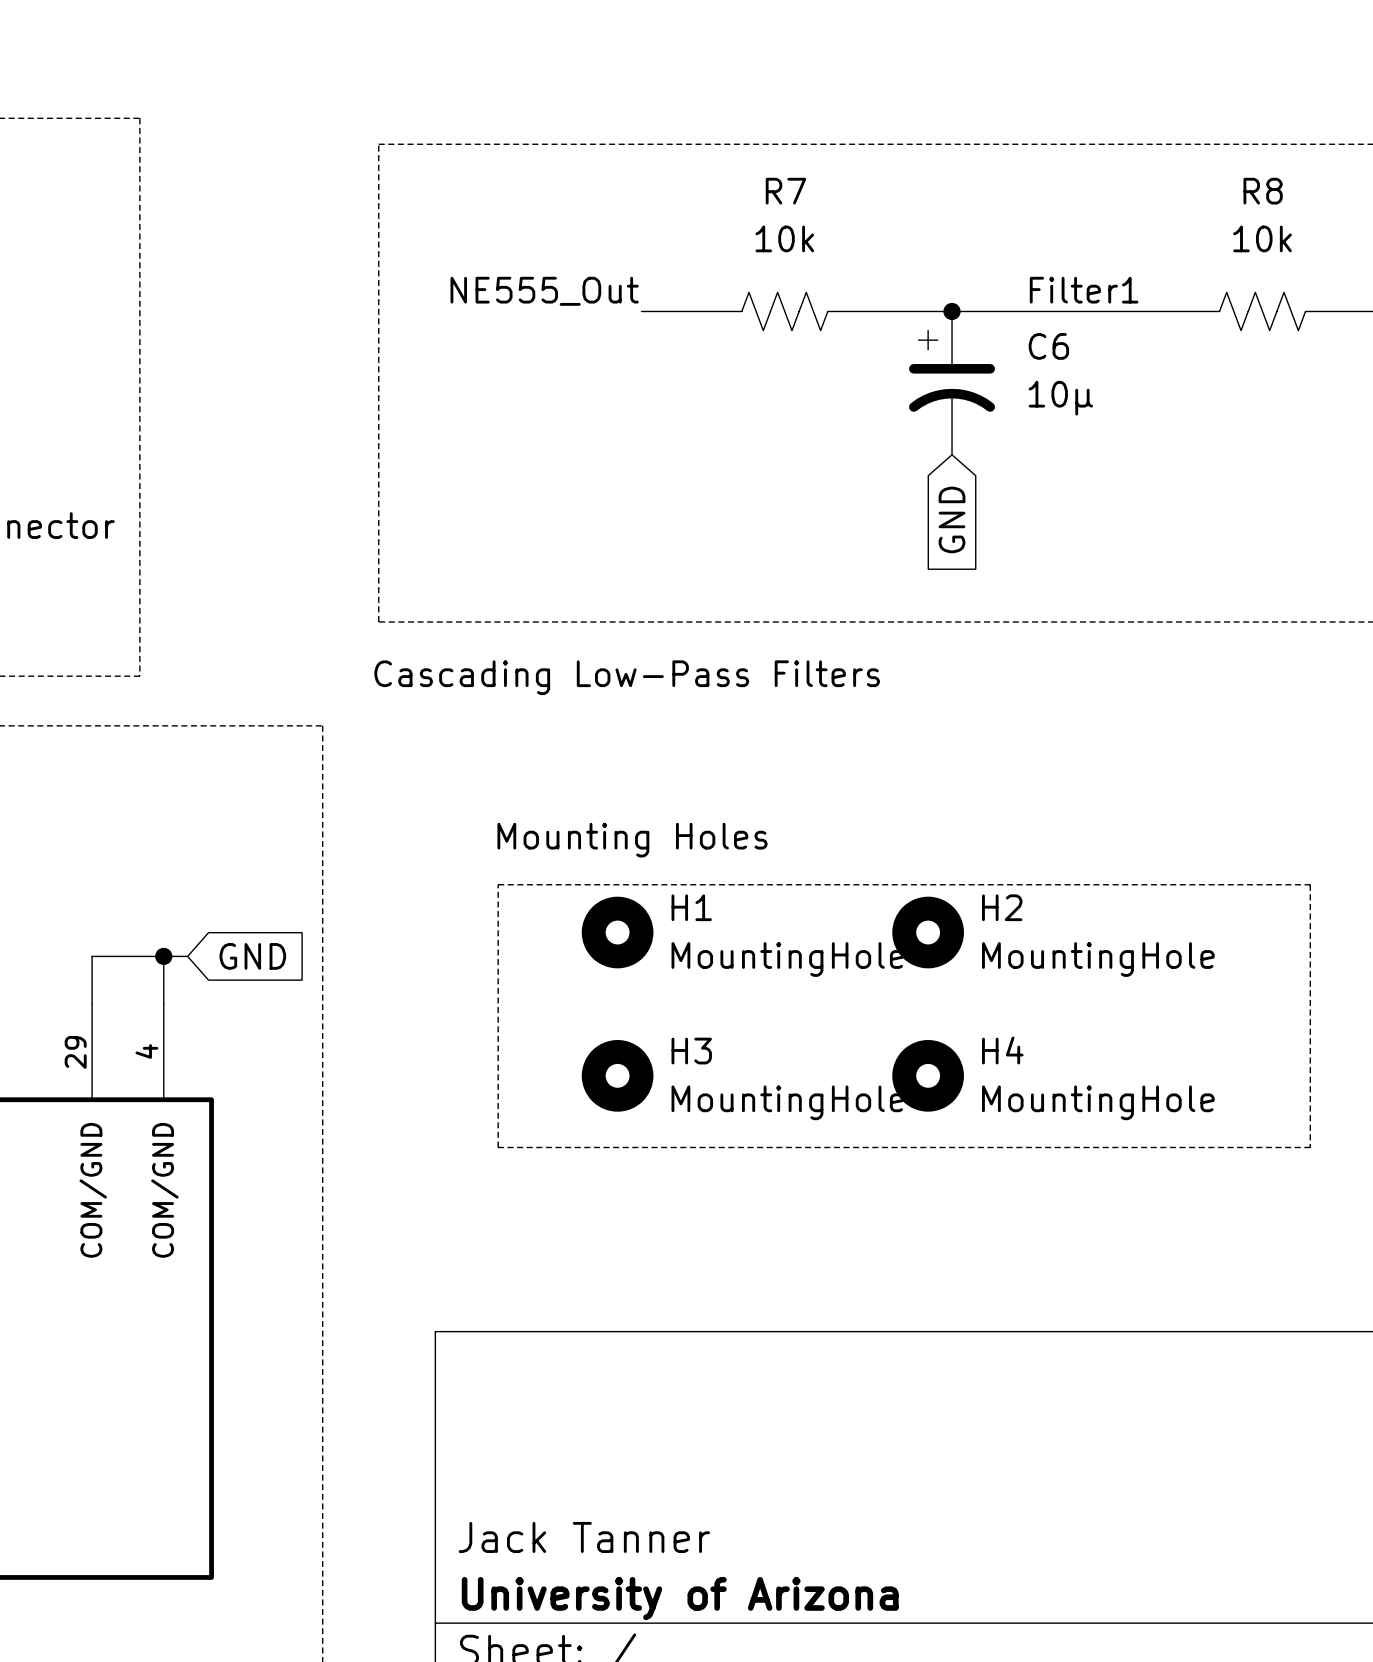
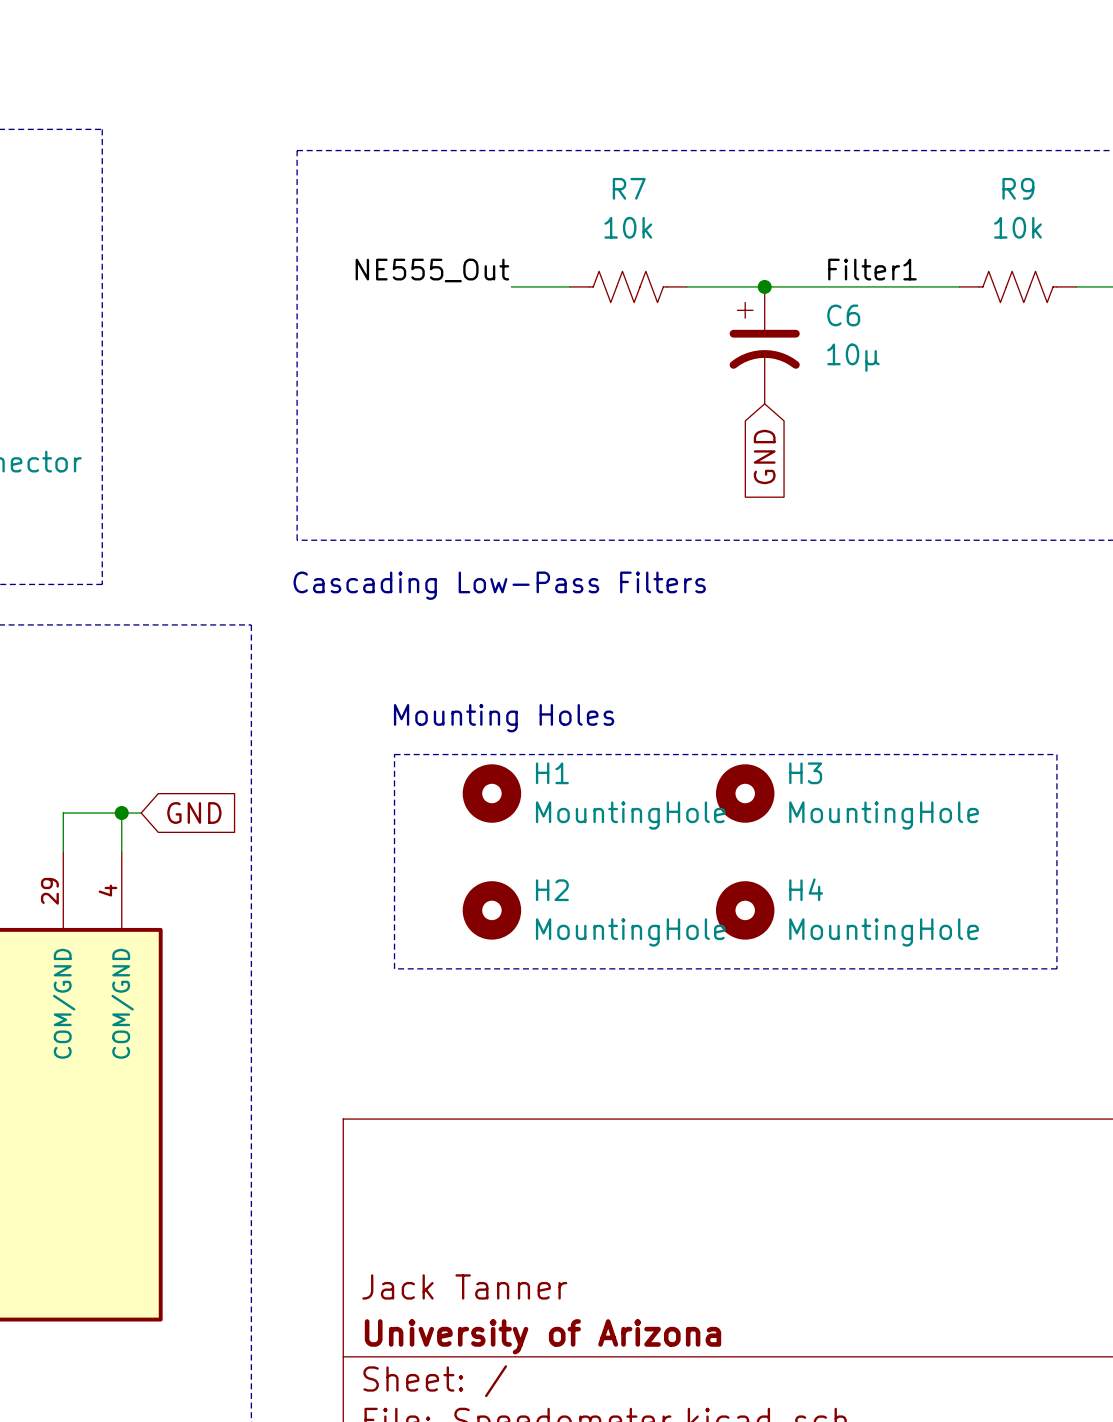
R8 name: R8 (1263, 191) -> R9 (1018, 188)
H2 name: H2 (1002, 907) -> H3 (805, 773)
H3 name: H3 (691, 1051) -> H2 (552, 890)

